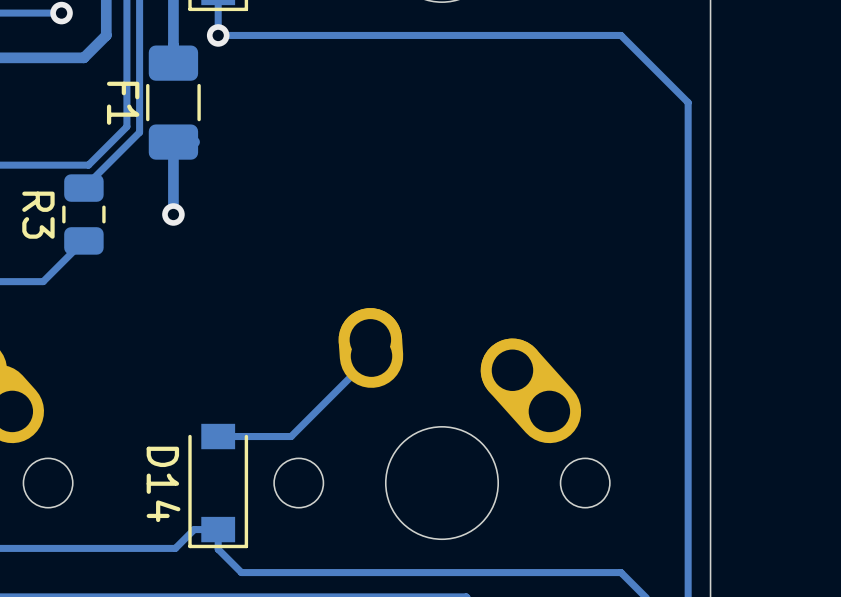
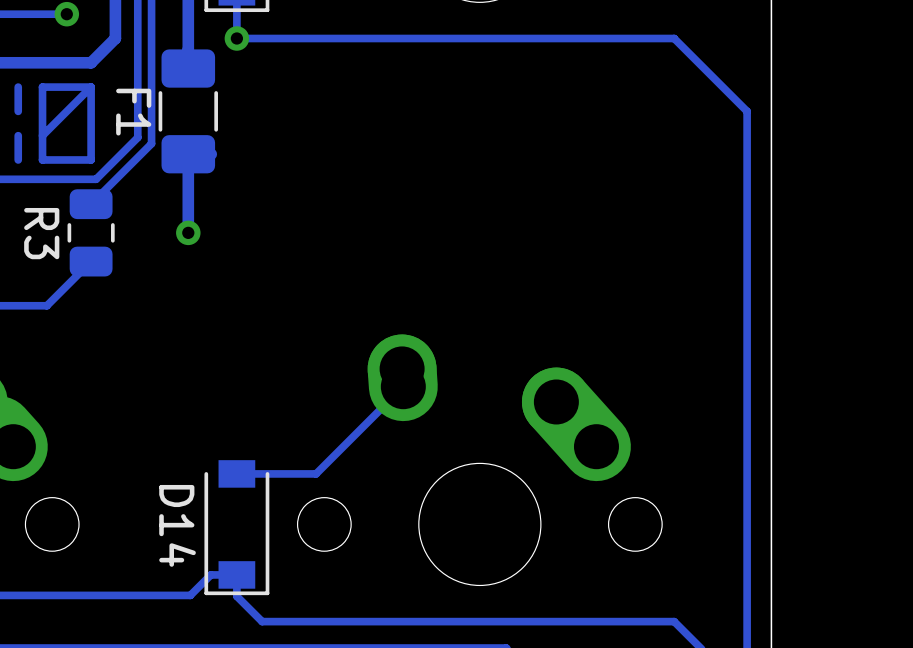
track: none -> (18, 87) (18, 111)
track: none -> (91, 87) (42, 87) (42, 159) (91, 159) (91, 87)
track: none -> (91, 87) (42, 135)
track: none -> (18, 135) (18, 159)

